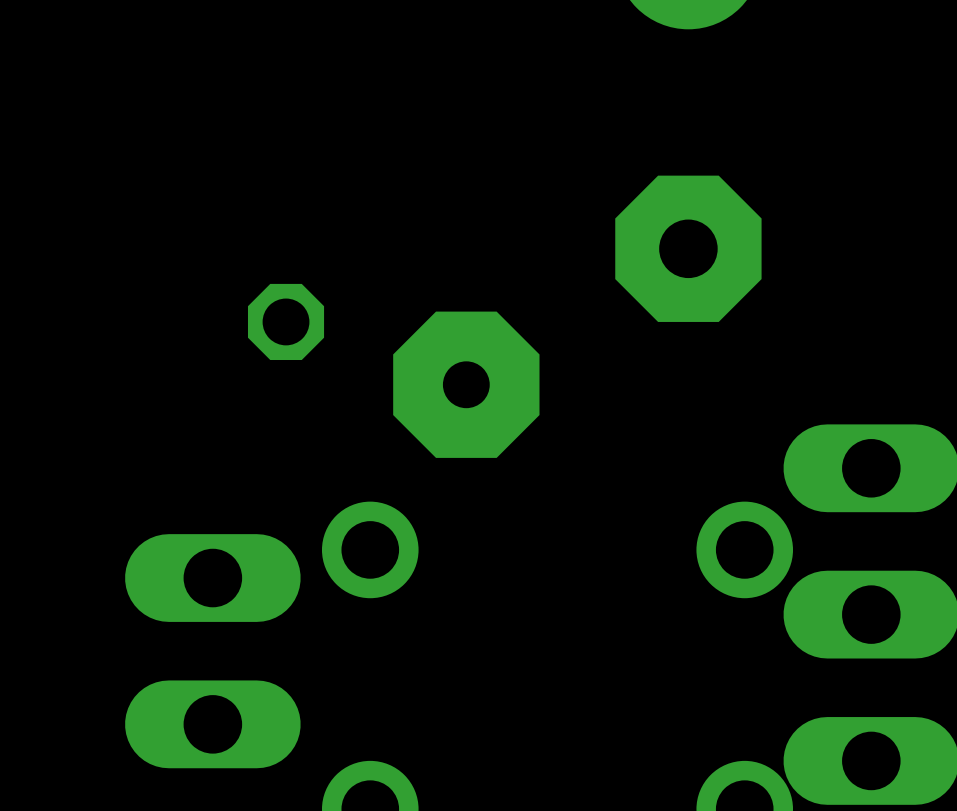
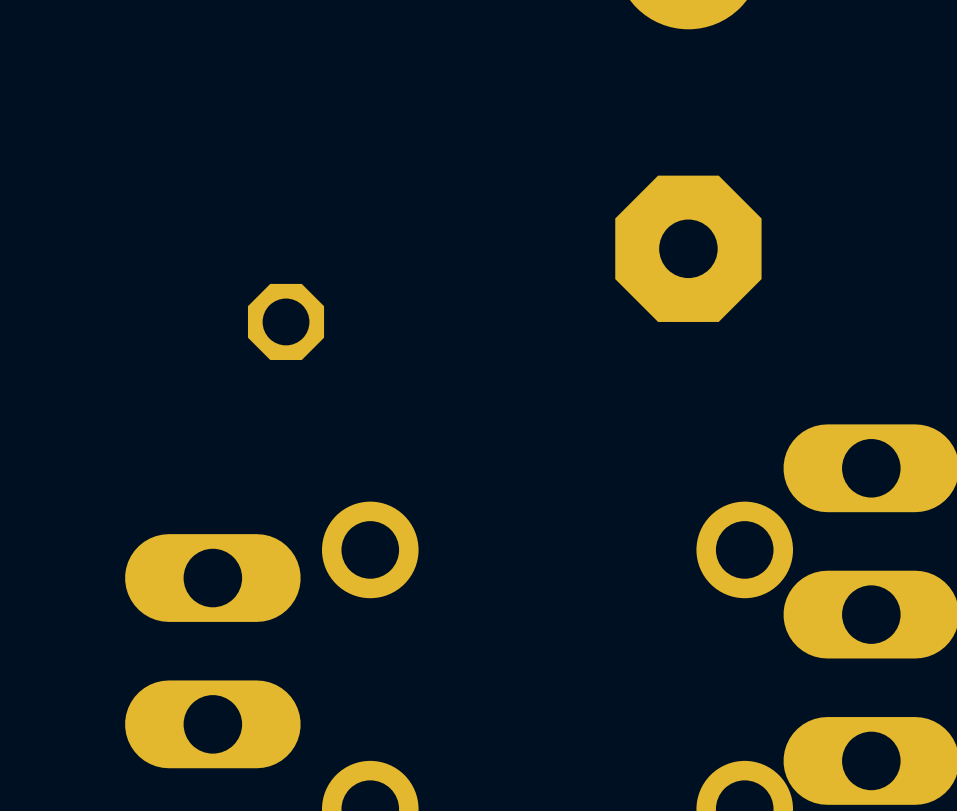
part: (466, 384) -> none

